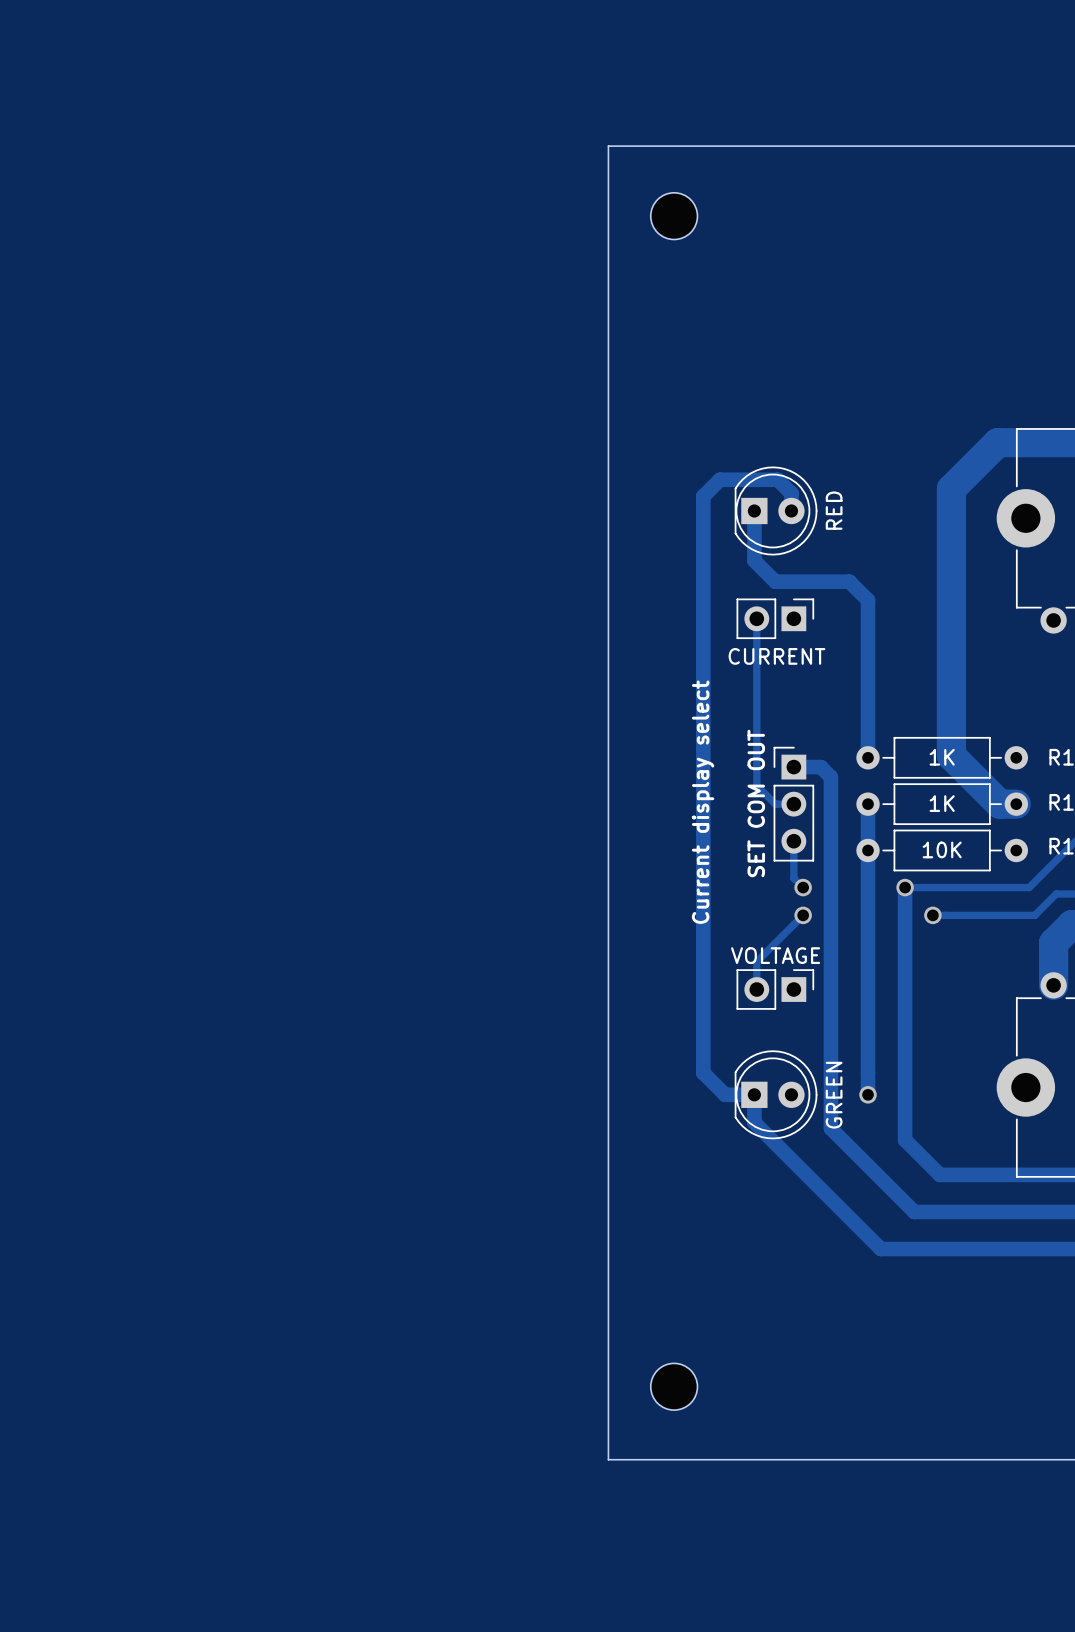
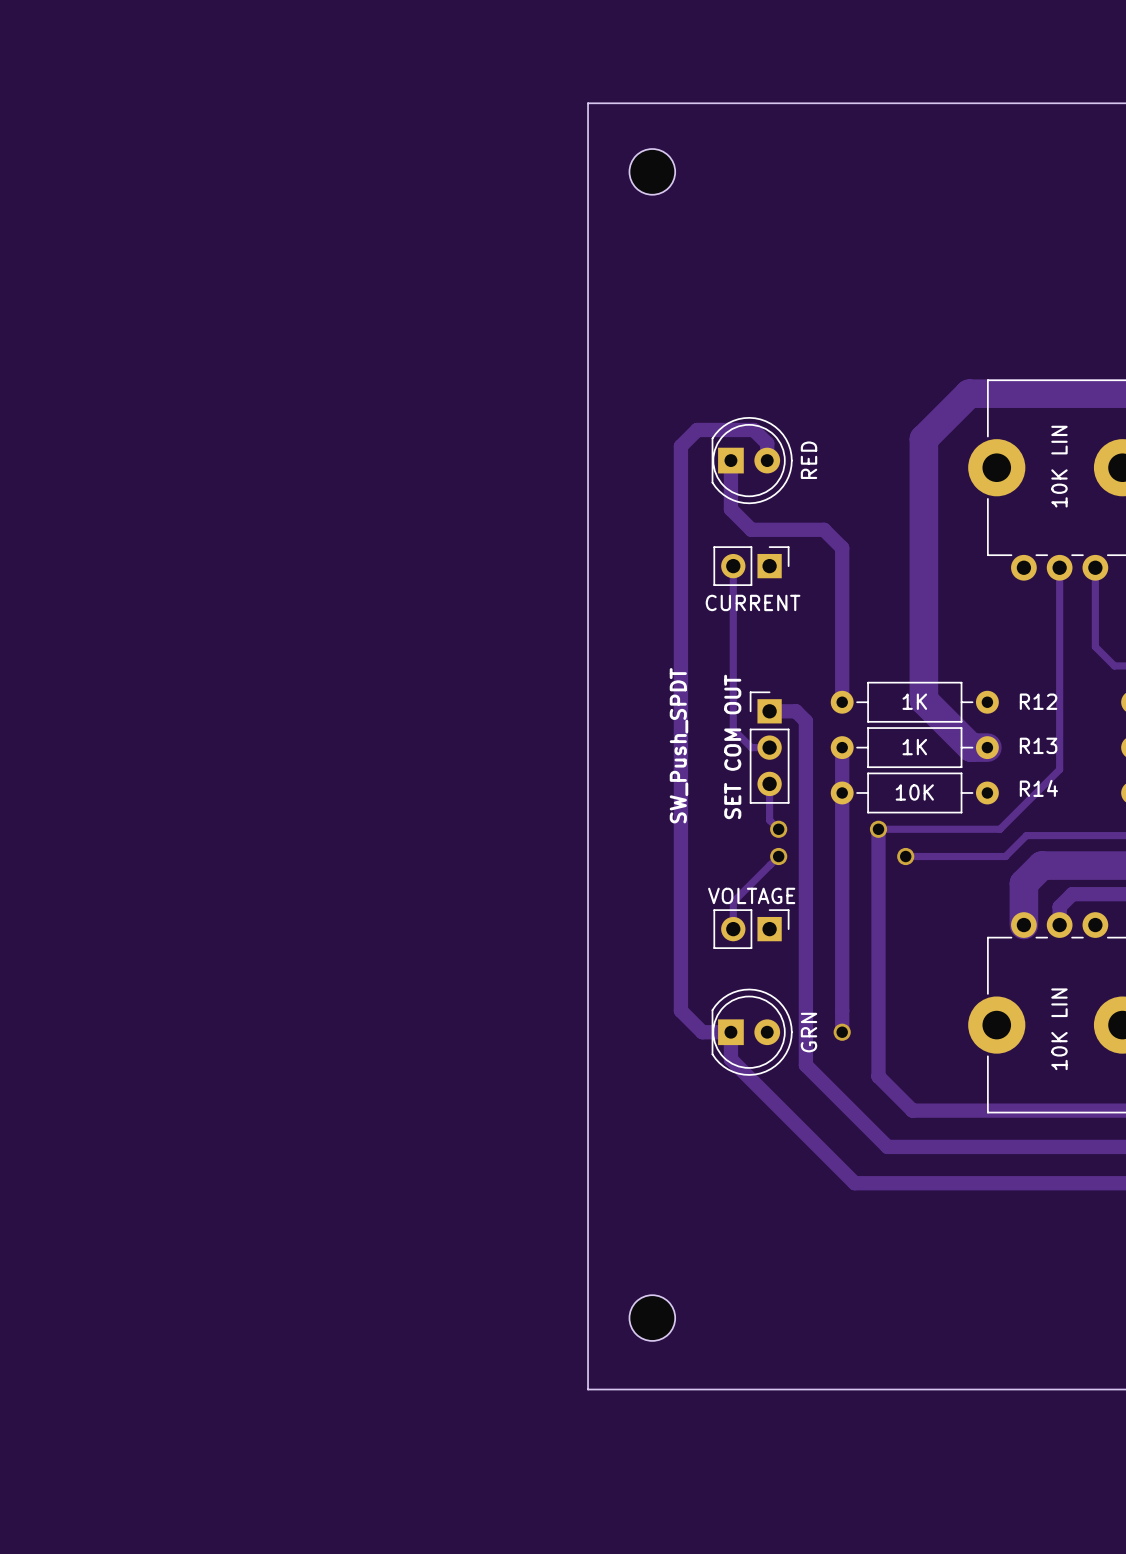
part value: Current display select (703, 802) -> SW_Push_SPDT (678, 745)
part value: GREEN (834, 1095) -> GRN (809, 1032)

